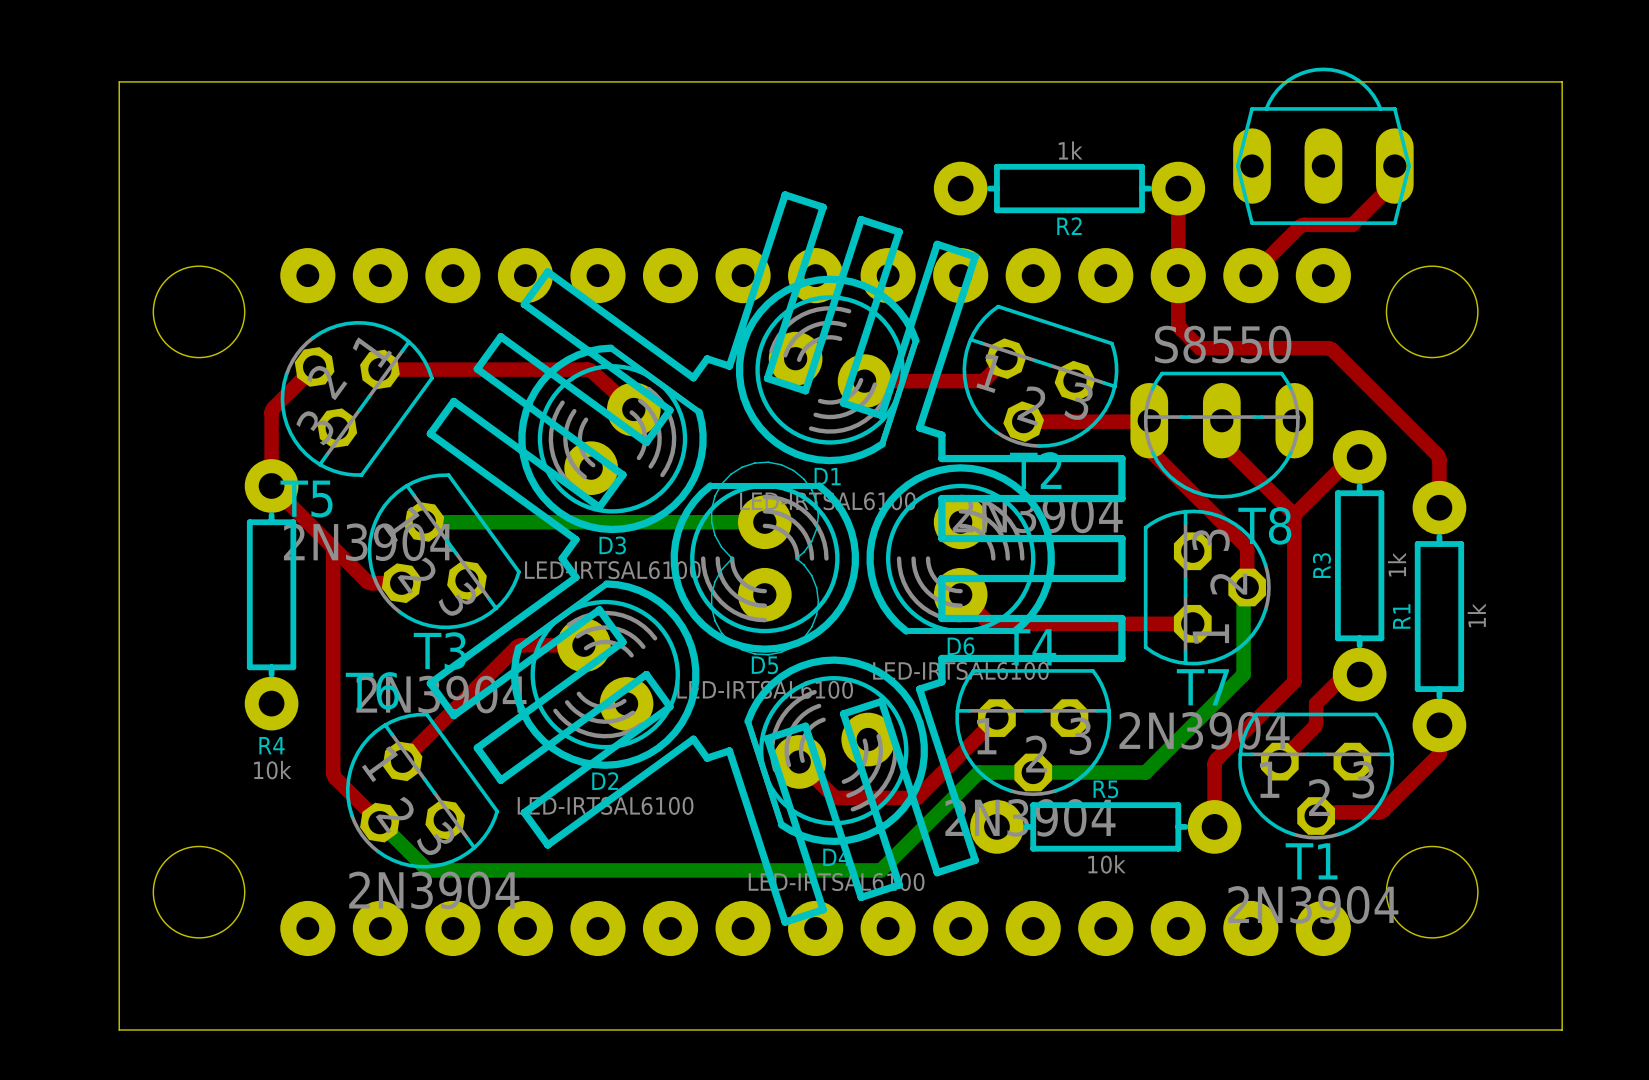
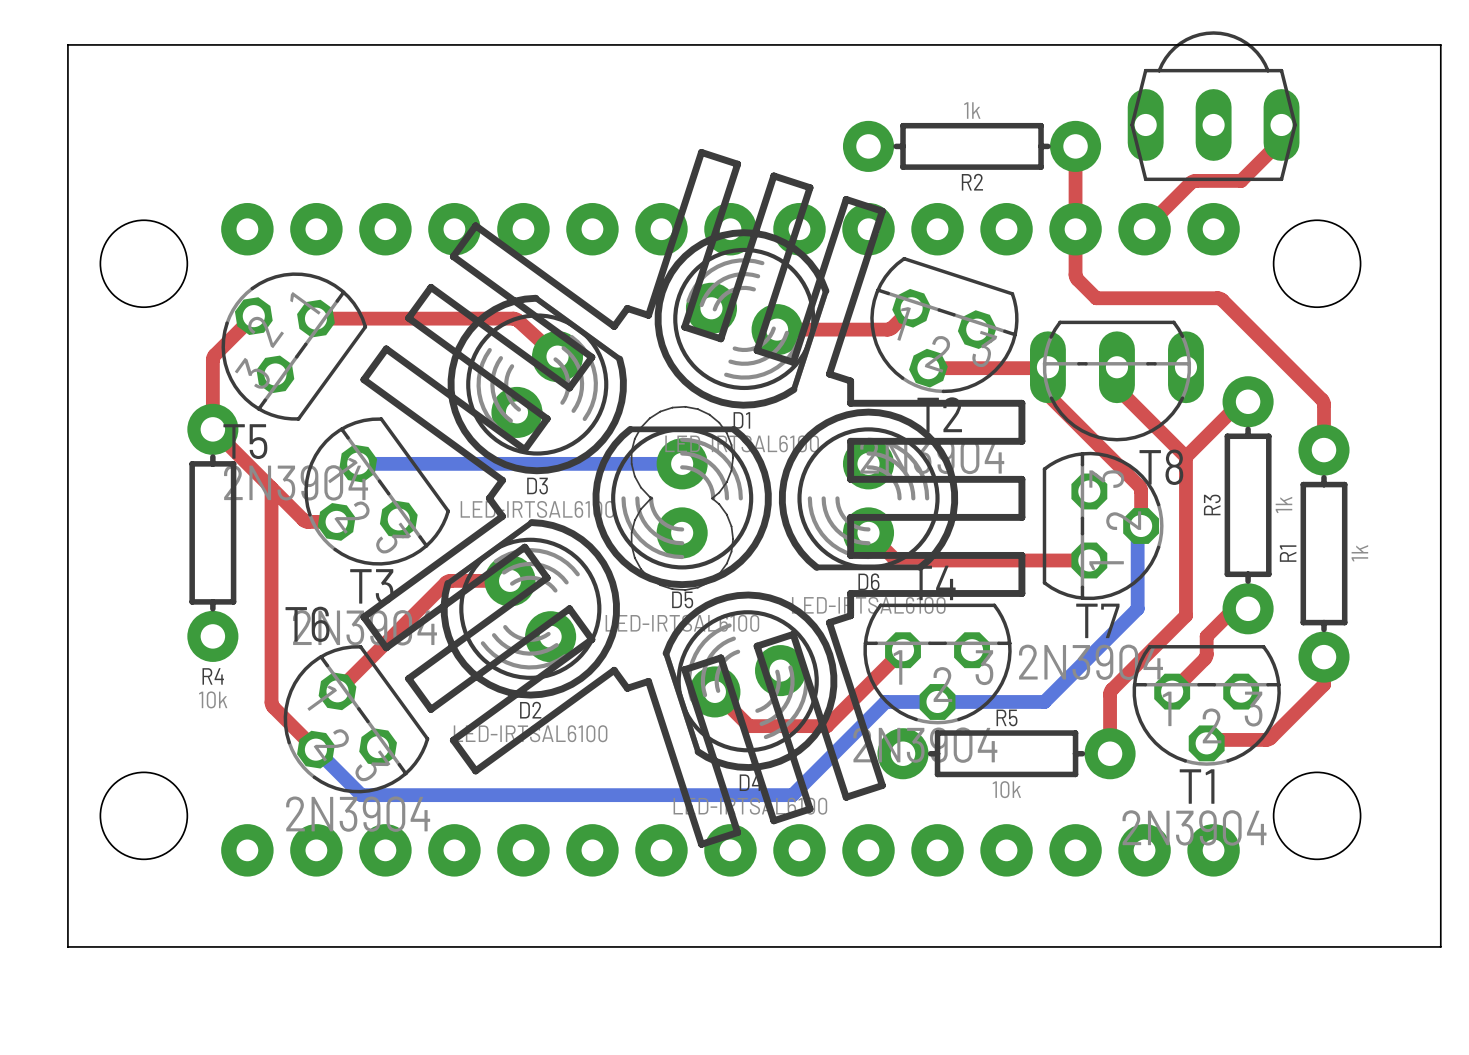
T8 value: S8550 (1223, 344) -> none

